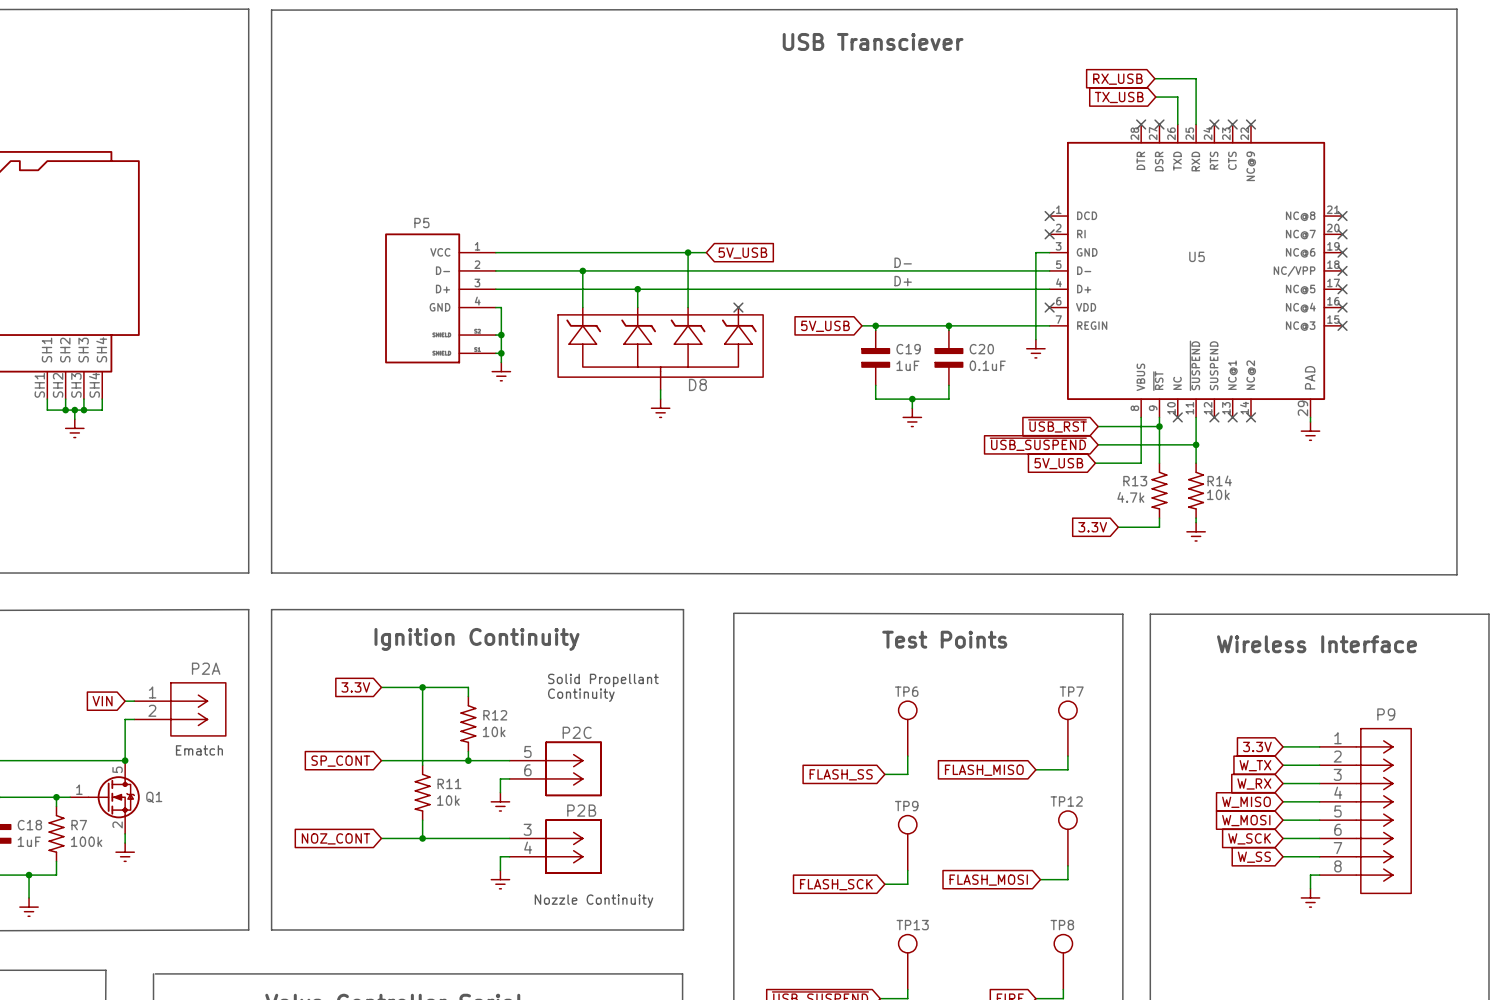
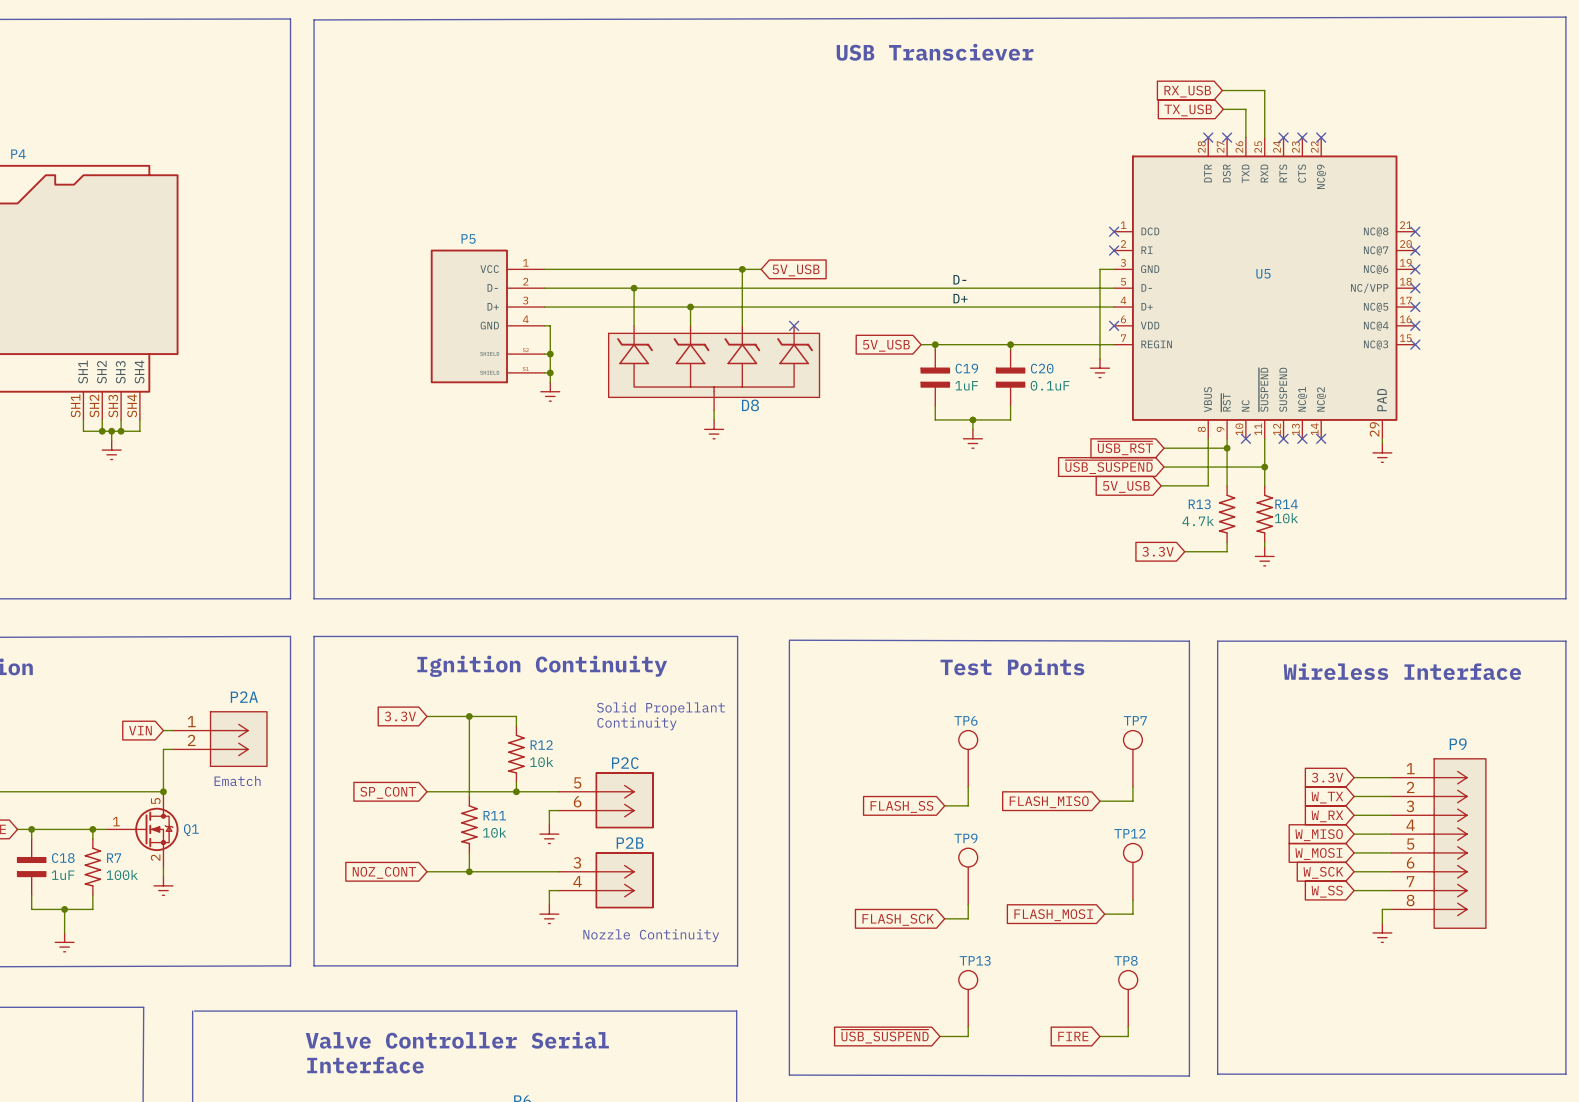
line: (271, 10) (1456, 9) (1456, 574) (271, 573) -> (314, 19) (1565, 17) (1565, 598) (314, 598)

